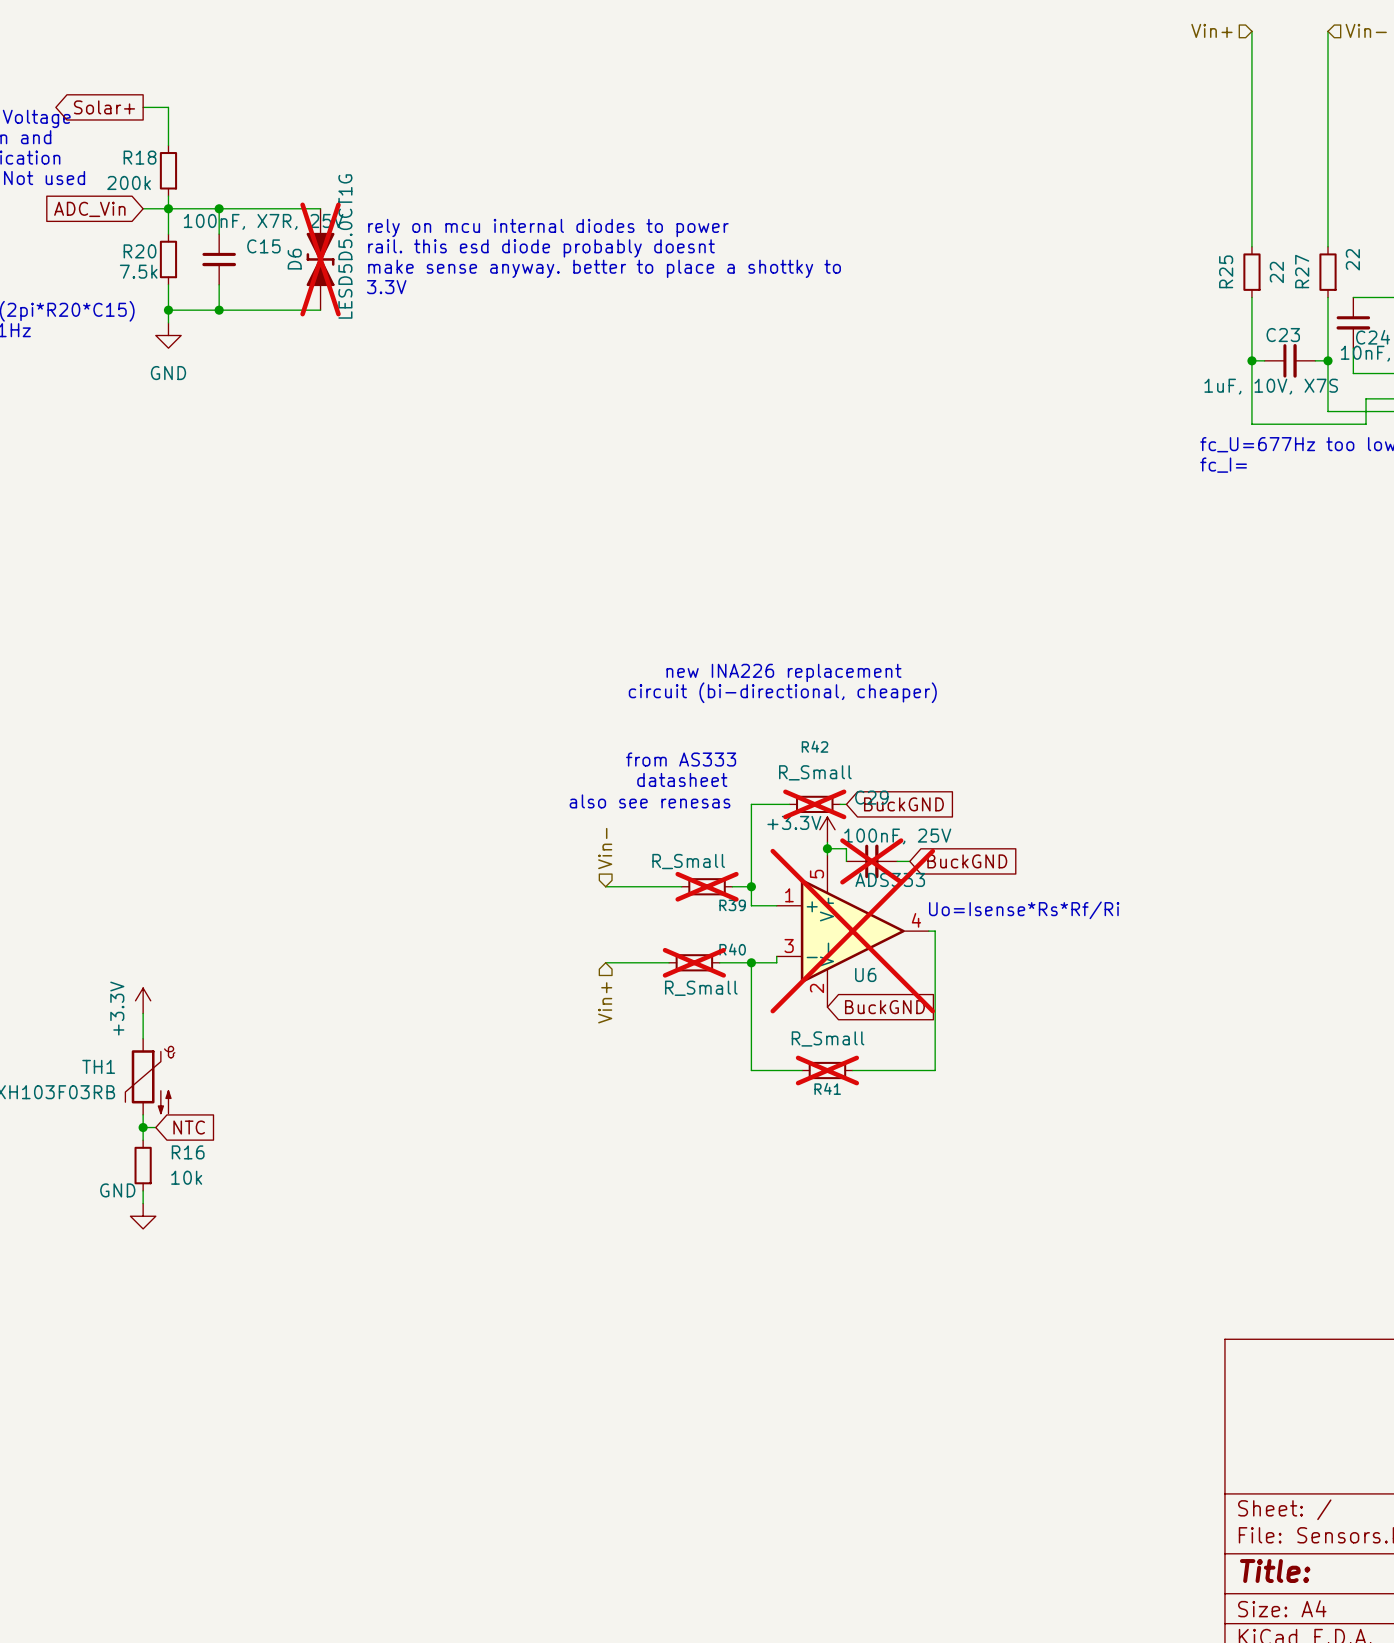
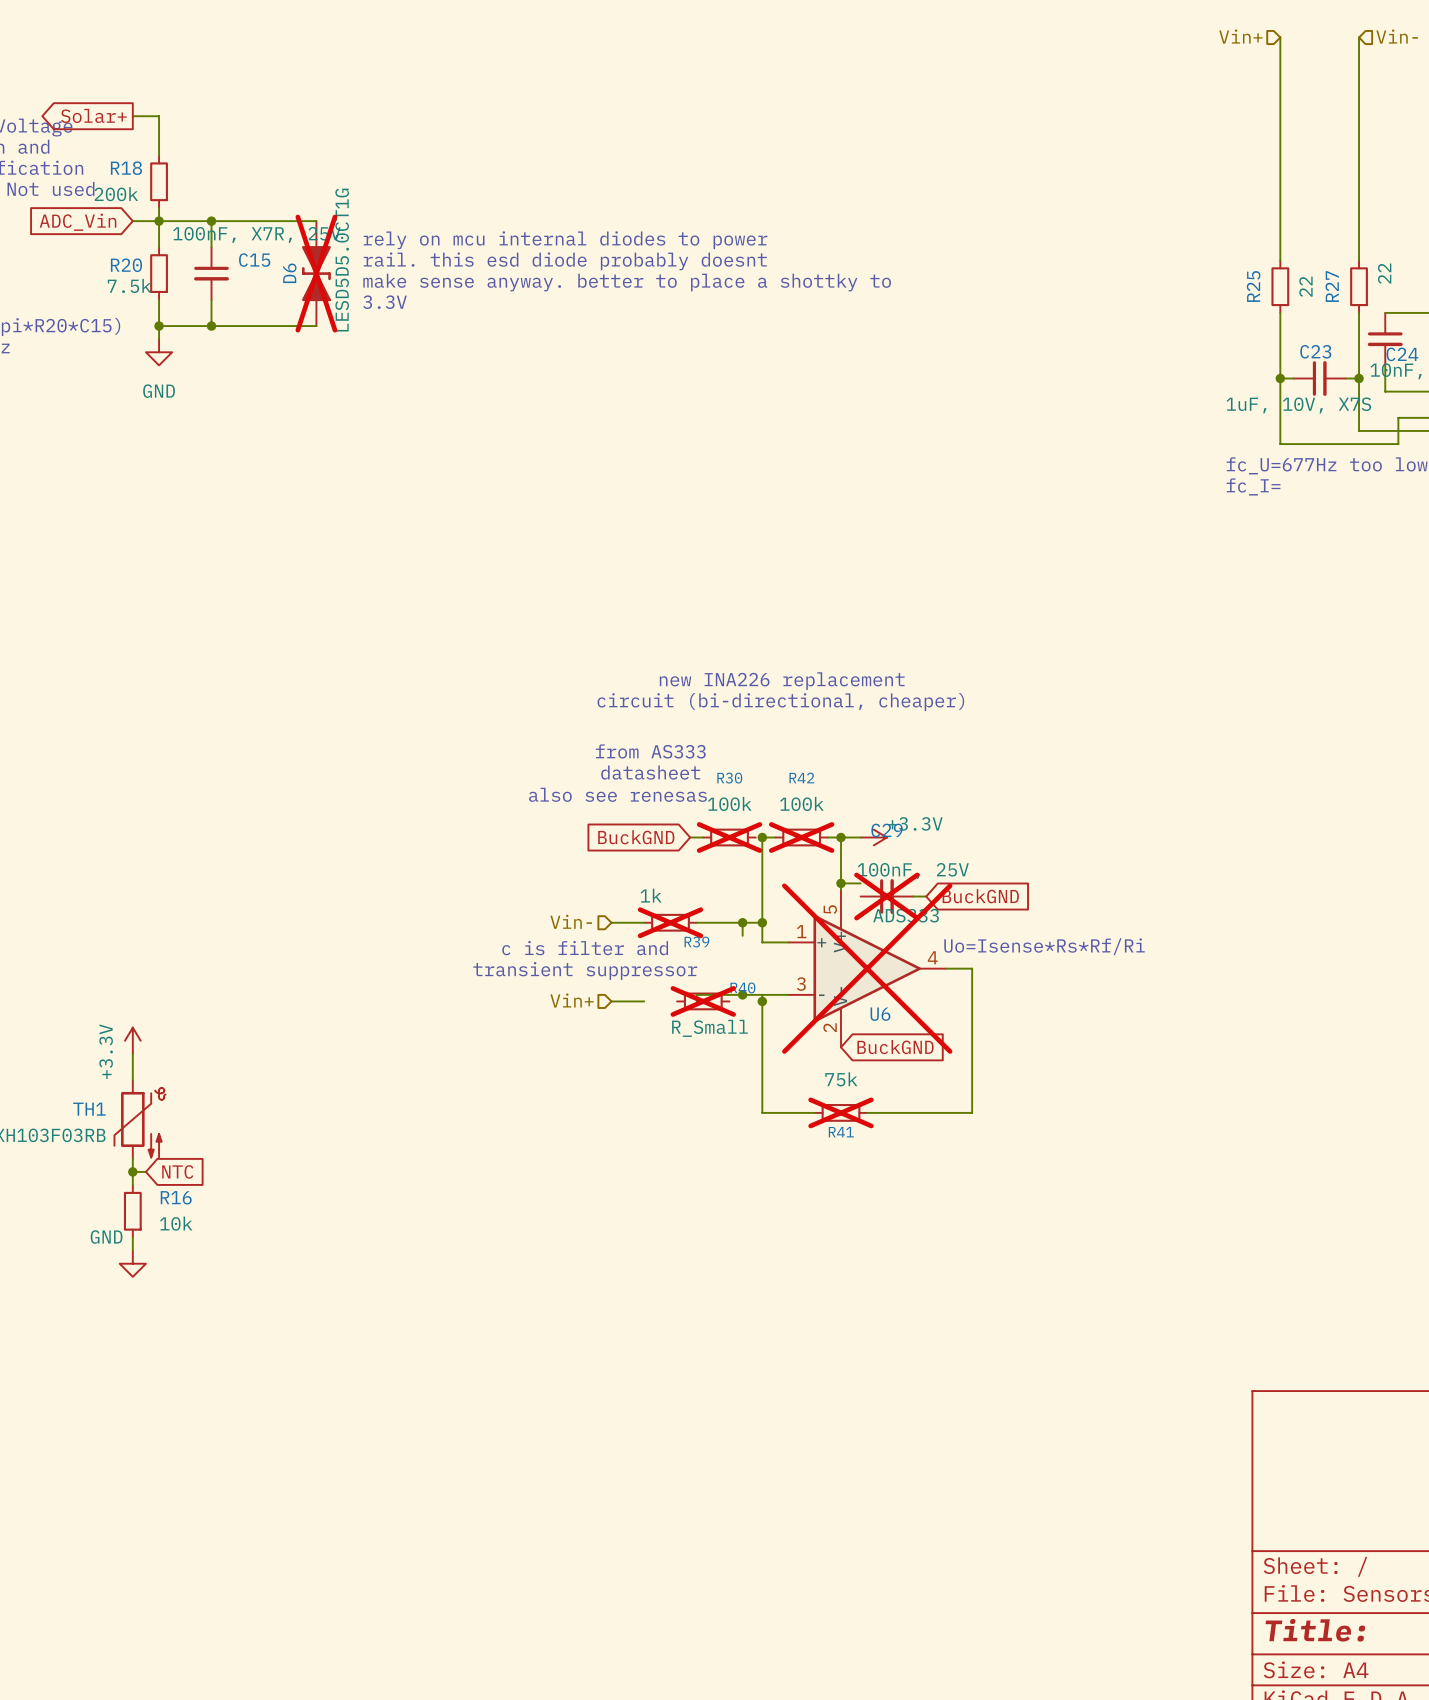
text position: new INA226 replacement (783, 672) -> new INA226 replacement (782, 681)
text position: circuit (bi-directional, cheaper) (782, 692) -> circuit (bi-directional, cheaper) (780, 702)
text position: from AS333 (681, 759) -> from AS333 (650, 751)
R42 value: R_Small (815, 772) -> 100k (801, 803)
text position: datasheet (682, 779) -> datasheet (650, 772)
text position: also see renesas (650, 801) -> also see renesas (617, 794)
wire: none -> (690, 837) (703, 837)
R30: none -> 100k (729, 837)
junction: none -> (762, 837)
R42 position: (814, 804) -> (801, 837)
junction: none -> (841, 837)
global label rotation: 0° (903, 804) -> 180° (636, 837)
global label position: BuckGND (903, 804) -> BuckGND (636, 837)
power symbol text position: +3.3V (794, 822) -> +3.3V (915, 823)
power symbol rotation: 0° (827, 829) -> 90° clockwise (873, 837)
power symbol position: +3.3V (827, 829) -> +3.3V (873, 837)
hierarchical label rotation: 0° (605, 848) -> 90° counterclockwise (571, 921)
hierarchical label position: Vin- (605, 848) -> Vin- (571, 921)
wire: (846, 848) (846, 861) -> none
R39 value: R_Small (688, 861) -> 1k (651, 895)
R39 position: (707, 886) -> (670, 922)
junction: none -> (742, 922)
text: none -> c is filter and (585, 948)
wire: (935, 931) (935, 1070) -> (952, 968) (972, 968) (972, 1112) (952, 1112)
text: none -> transient suppressor (585, 970)
junction: none -> (742, 994)
wire: (776, 956) (776, 962) (719, 962) -> (788, 994) (696, 994) (696, 1001)
wire: (637, 962) (669, 962) -> none
hierarchical label rotation: 0° (605, 1002) -> 90° clockwise (572, 1000)
hierarchical label position: Vin+ (605, 1002) -> Vin+ (572, 1000)
R41 value: R_Small (828, 1038) -> 75k (841, 1079)

